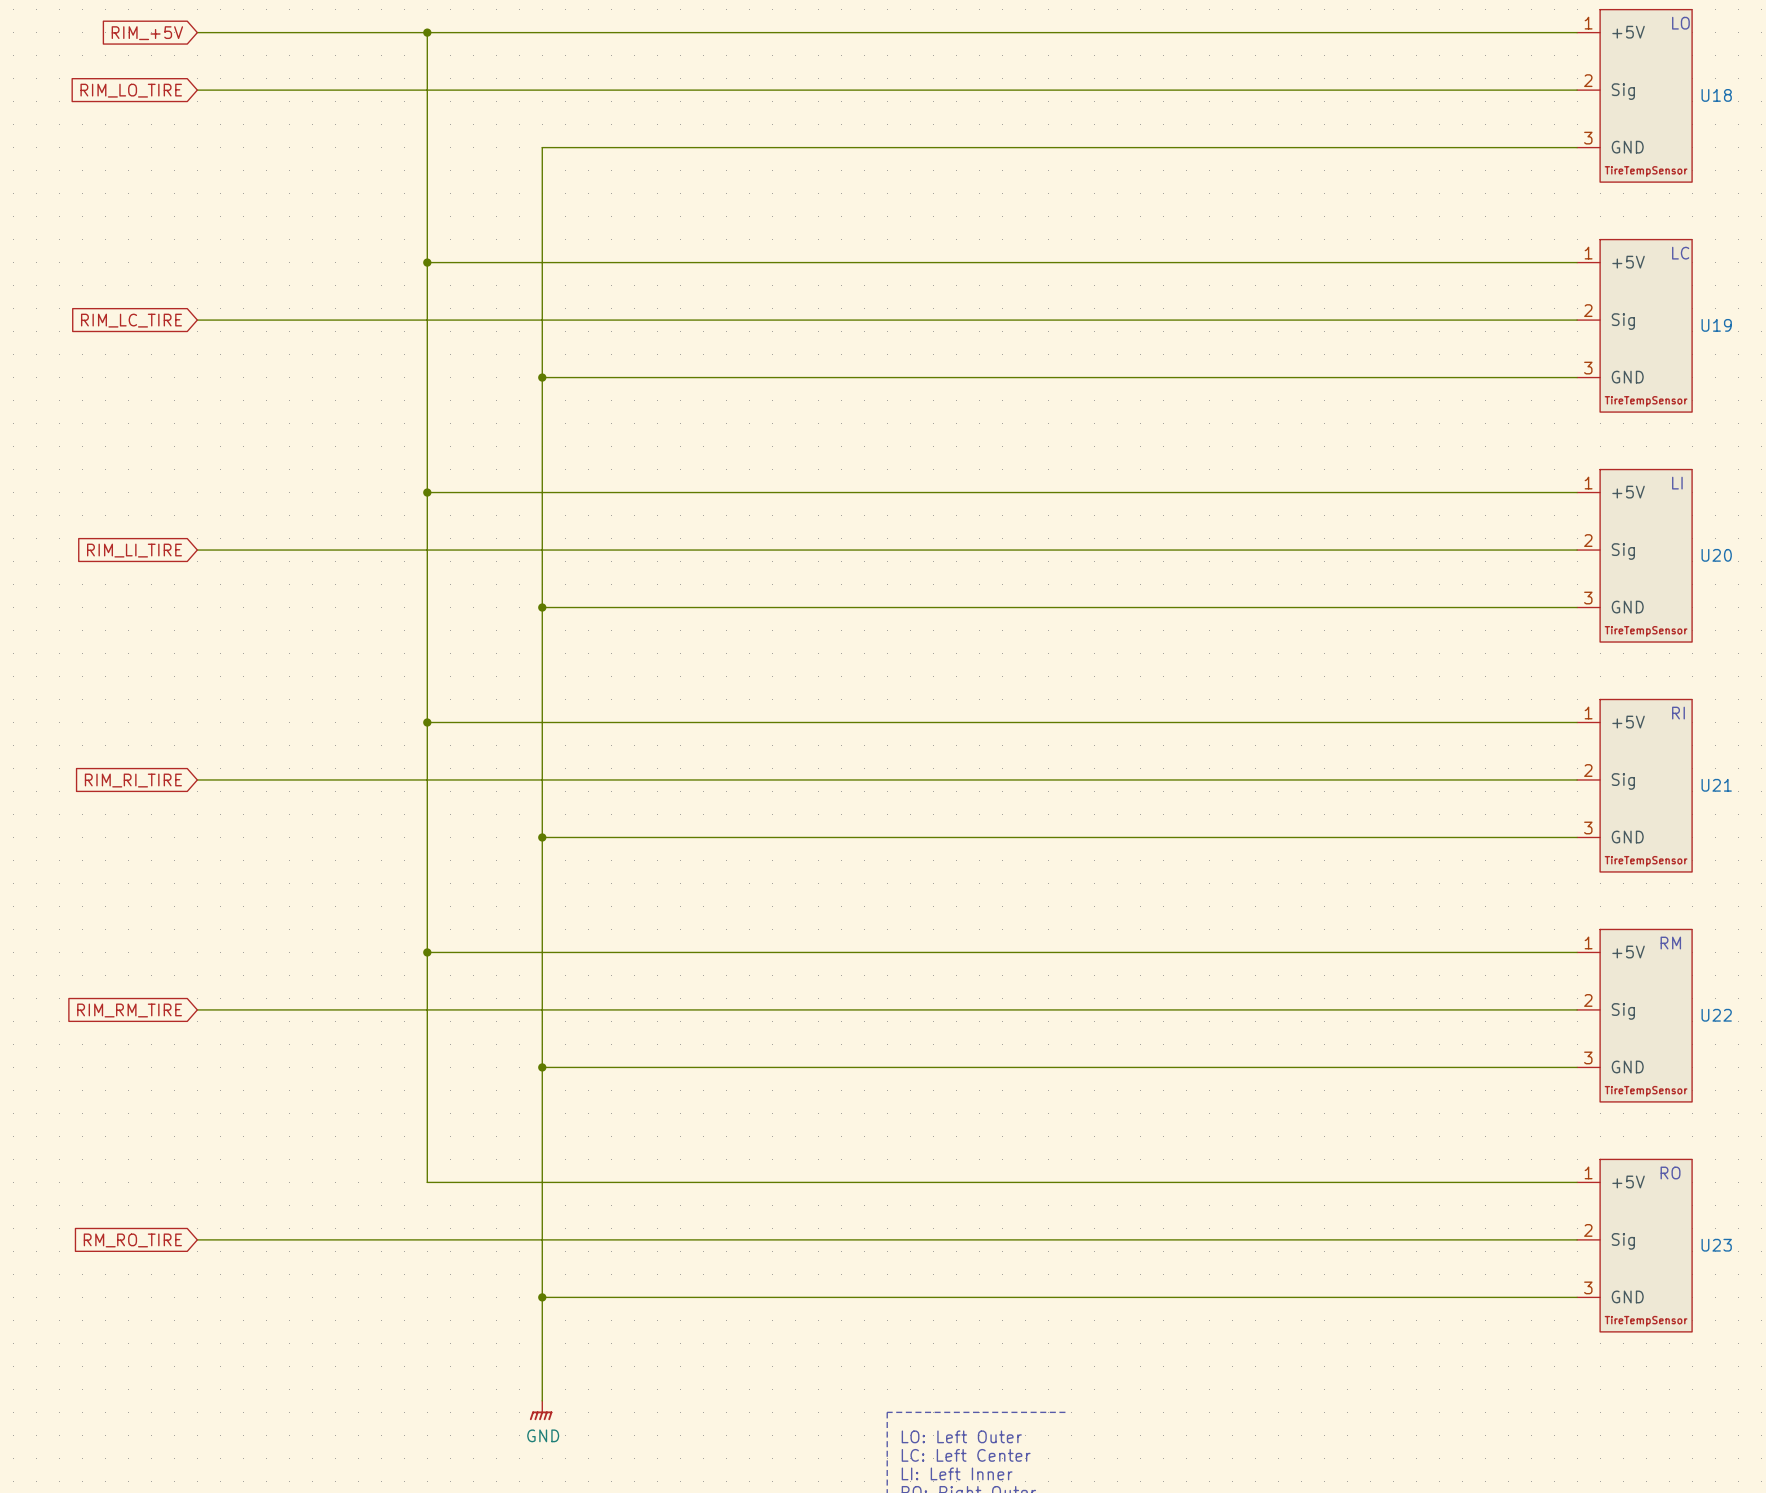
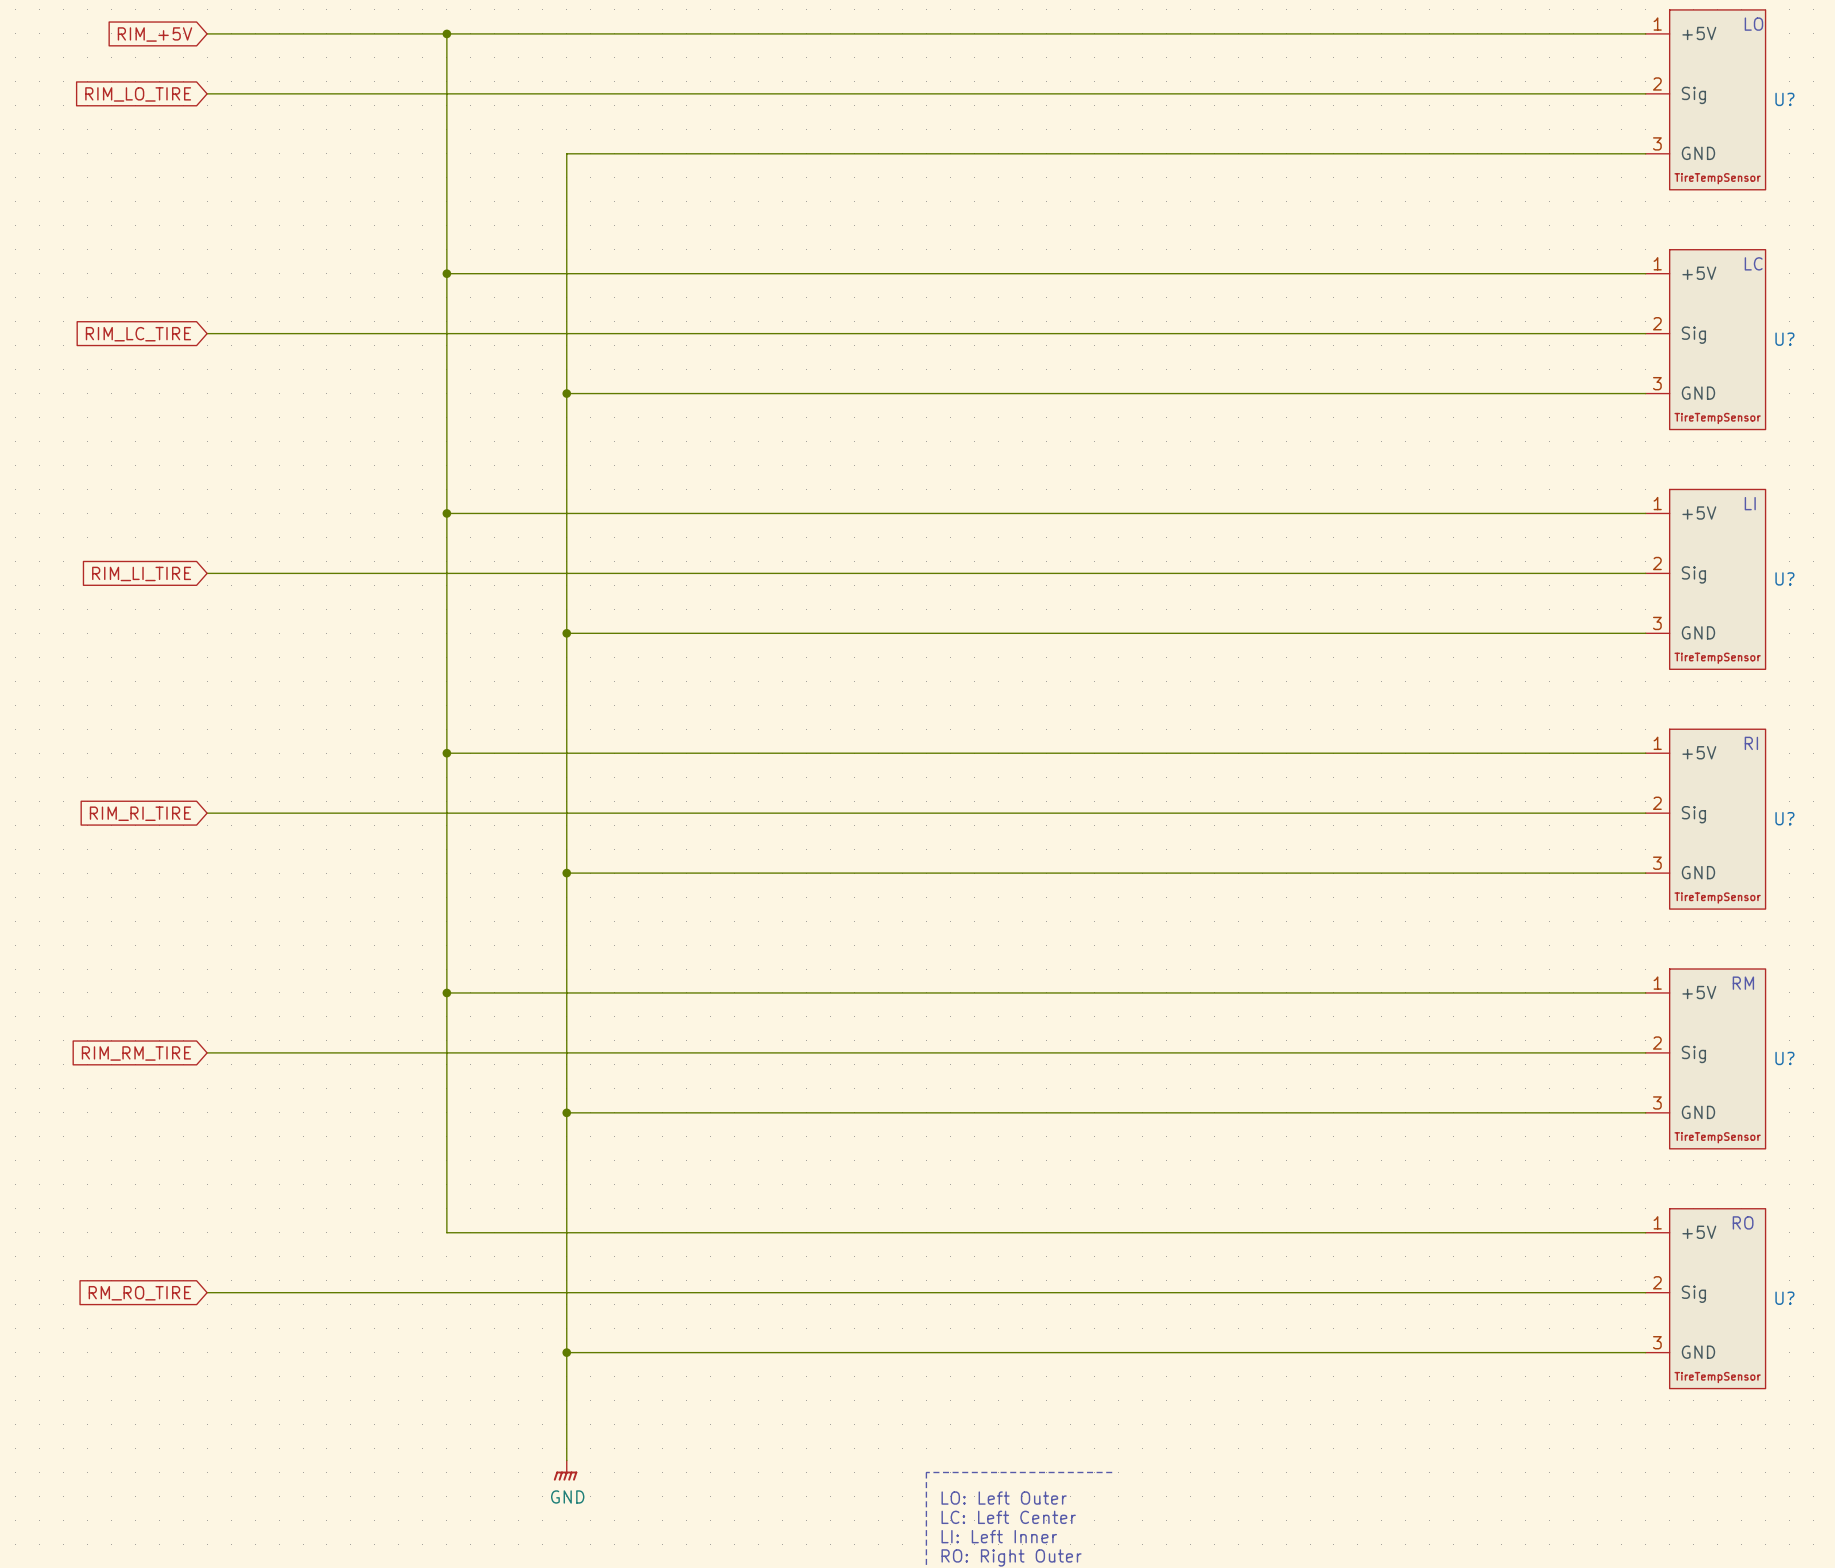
U18 name: U18 (1716, 95) -> U? (1784, 99)
U19 name: U19 (1716, 325) -> U? (1784, 339)
U20 name: U20 (1716, 555) -> U? (1784, 578)
U21 name: U21 (1716, 785) -> U? (1784, 818)
U22 name: U22 (1716, 1015) -> U? (1784, 1058)
U23 name: U23 (1716, 1245) -> U? (1784, 1298)

